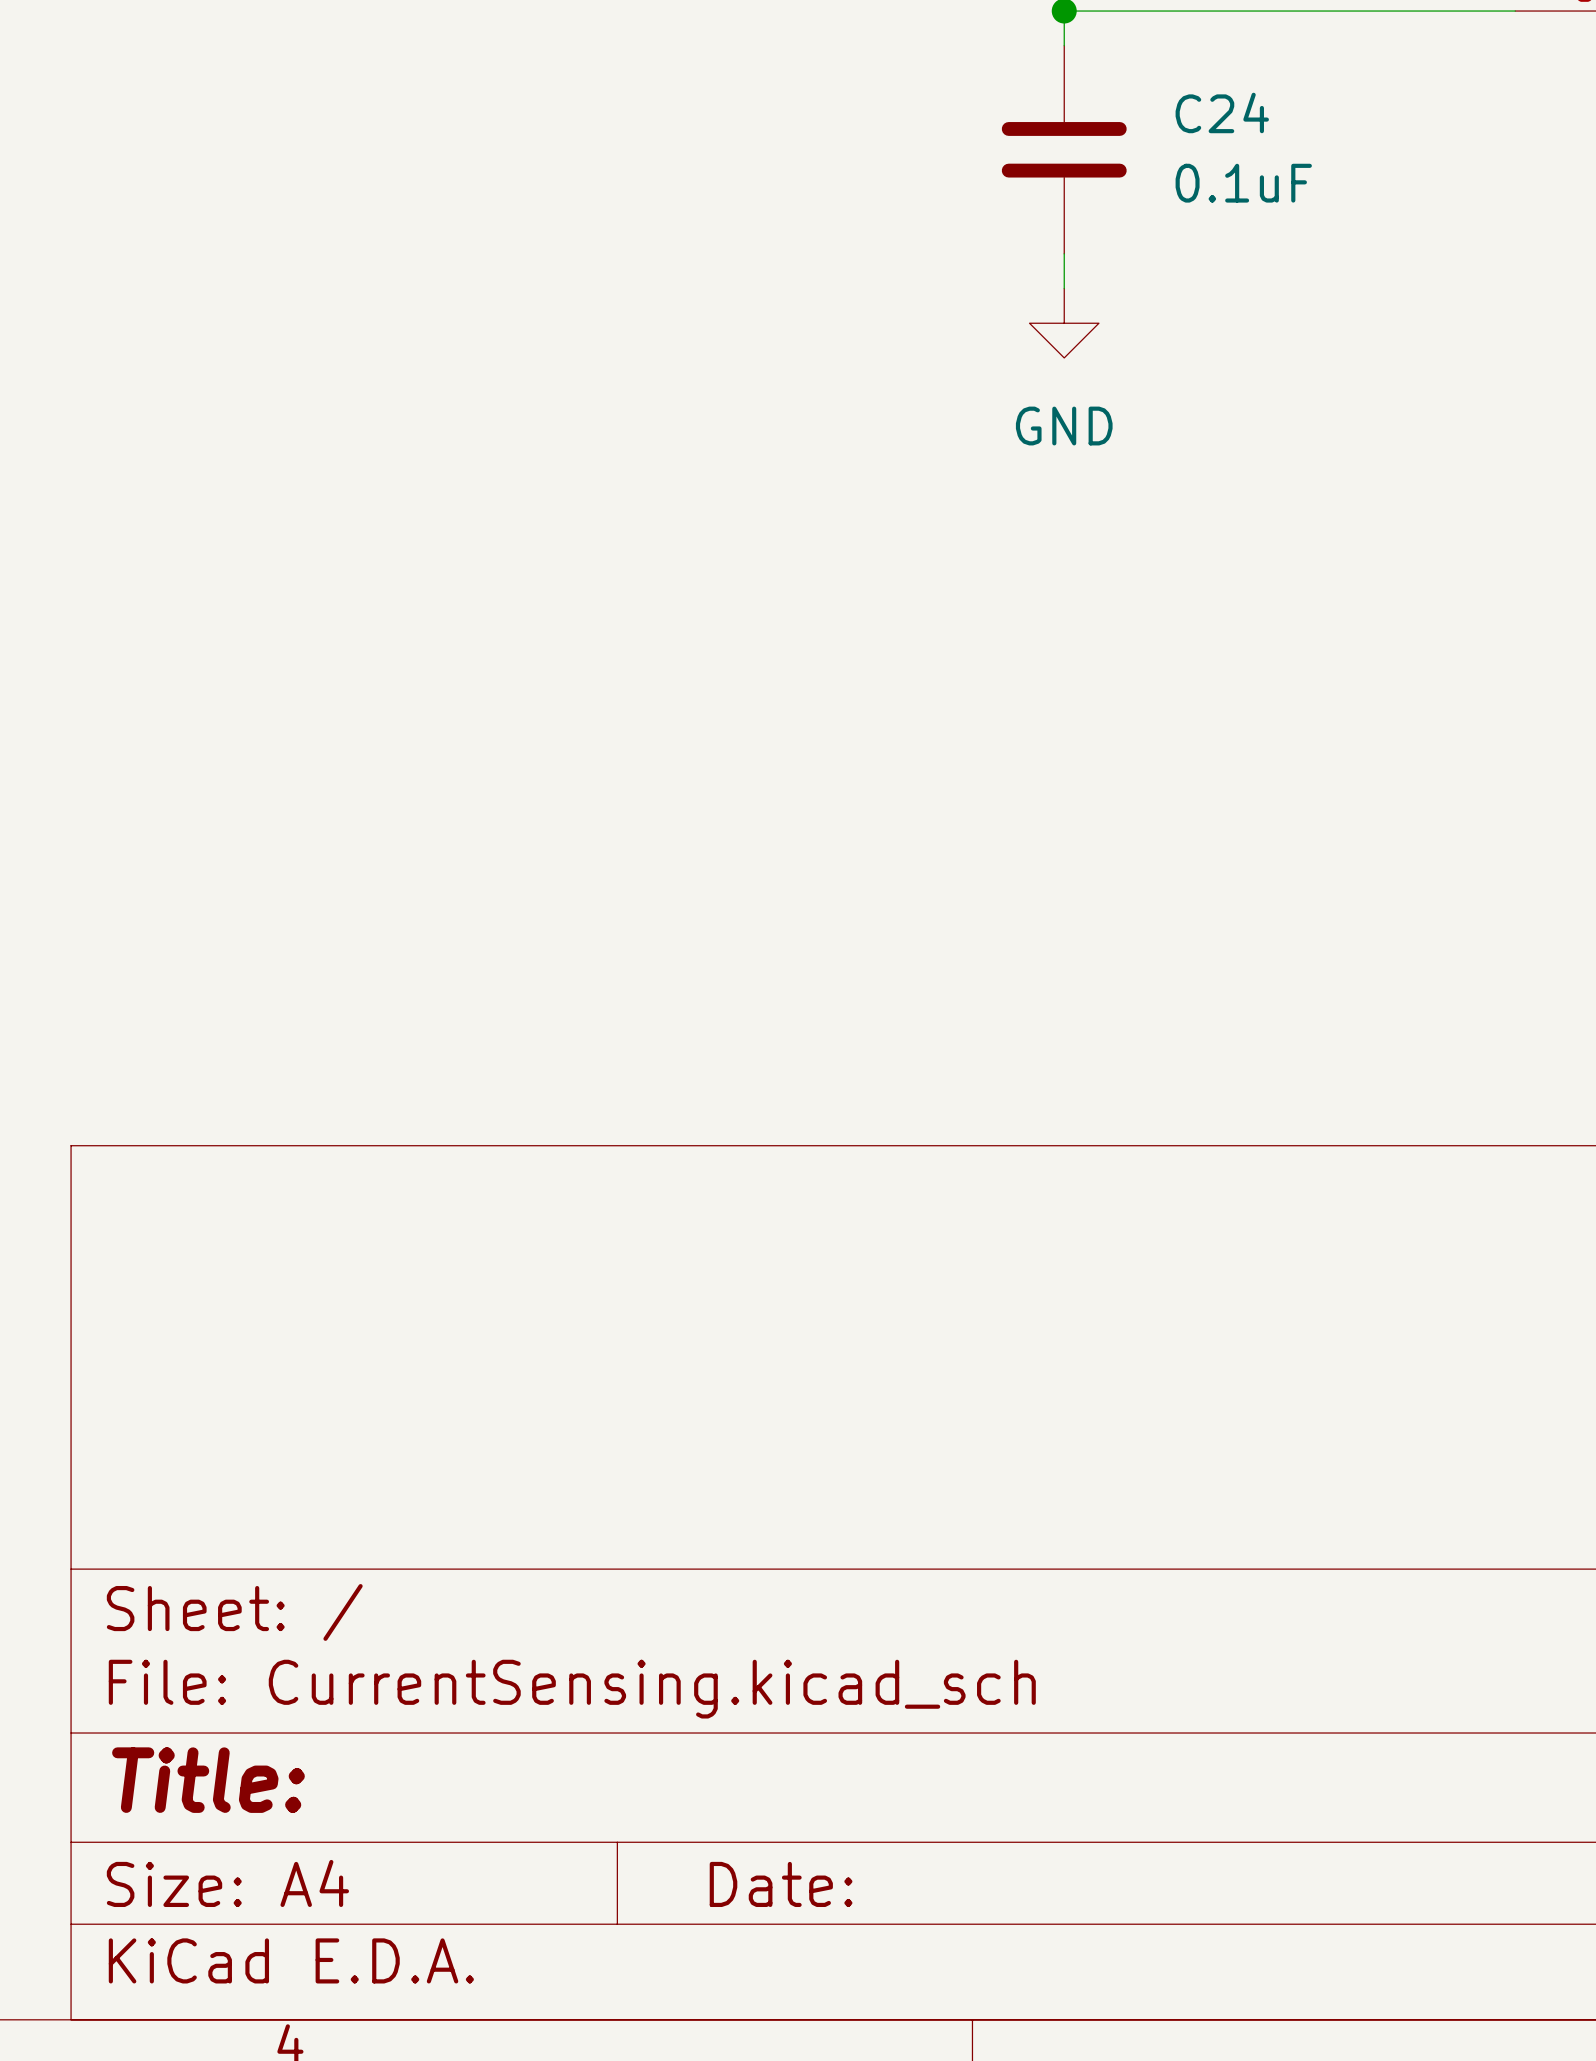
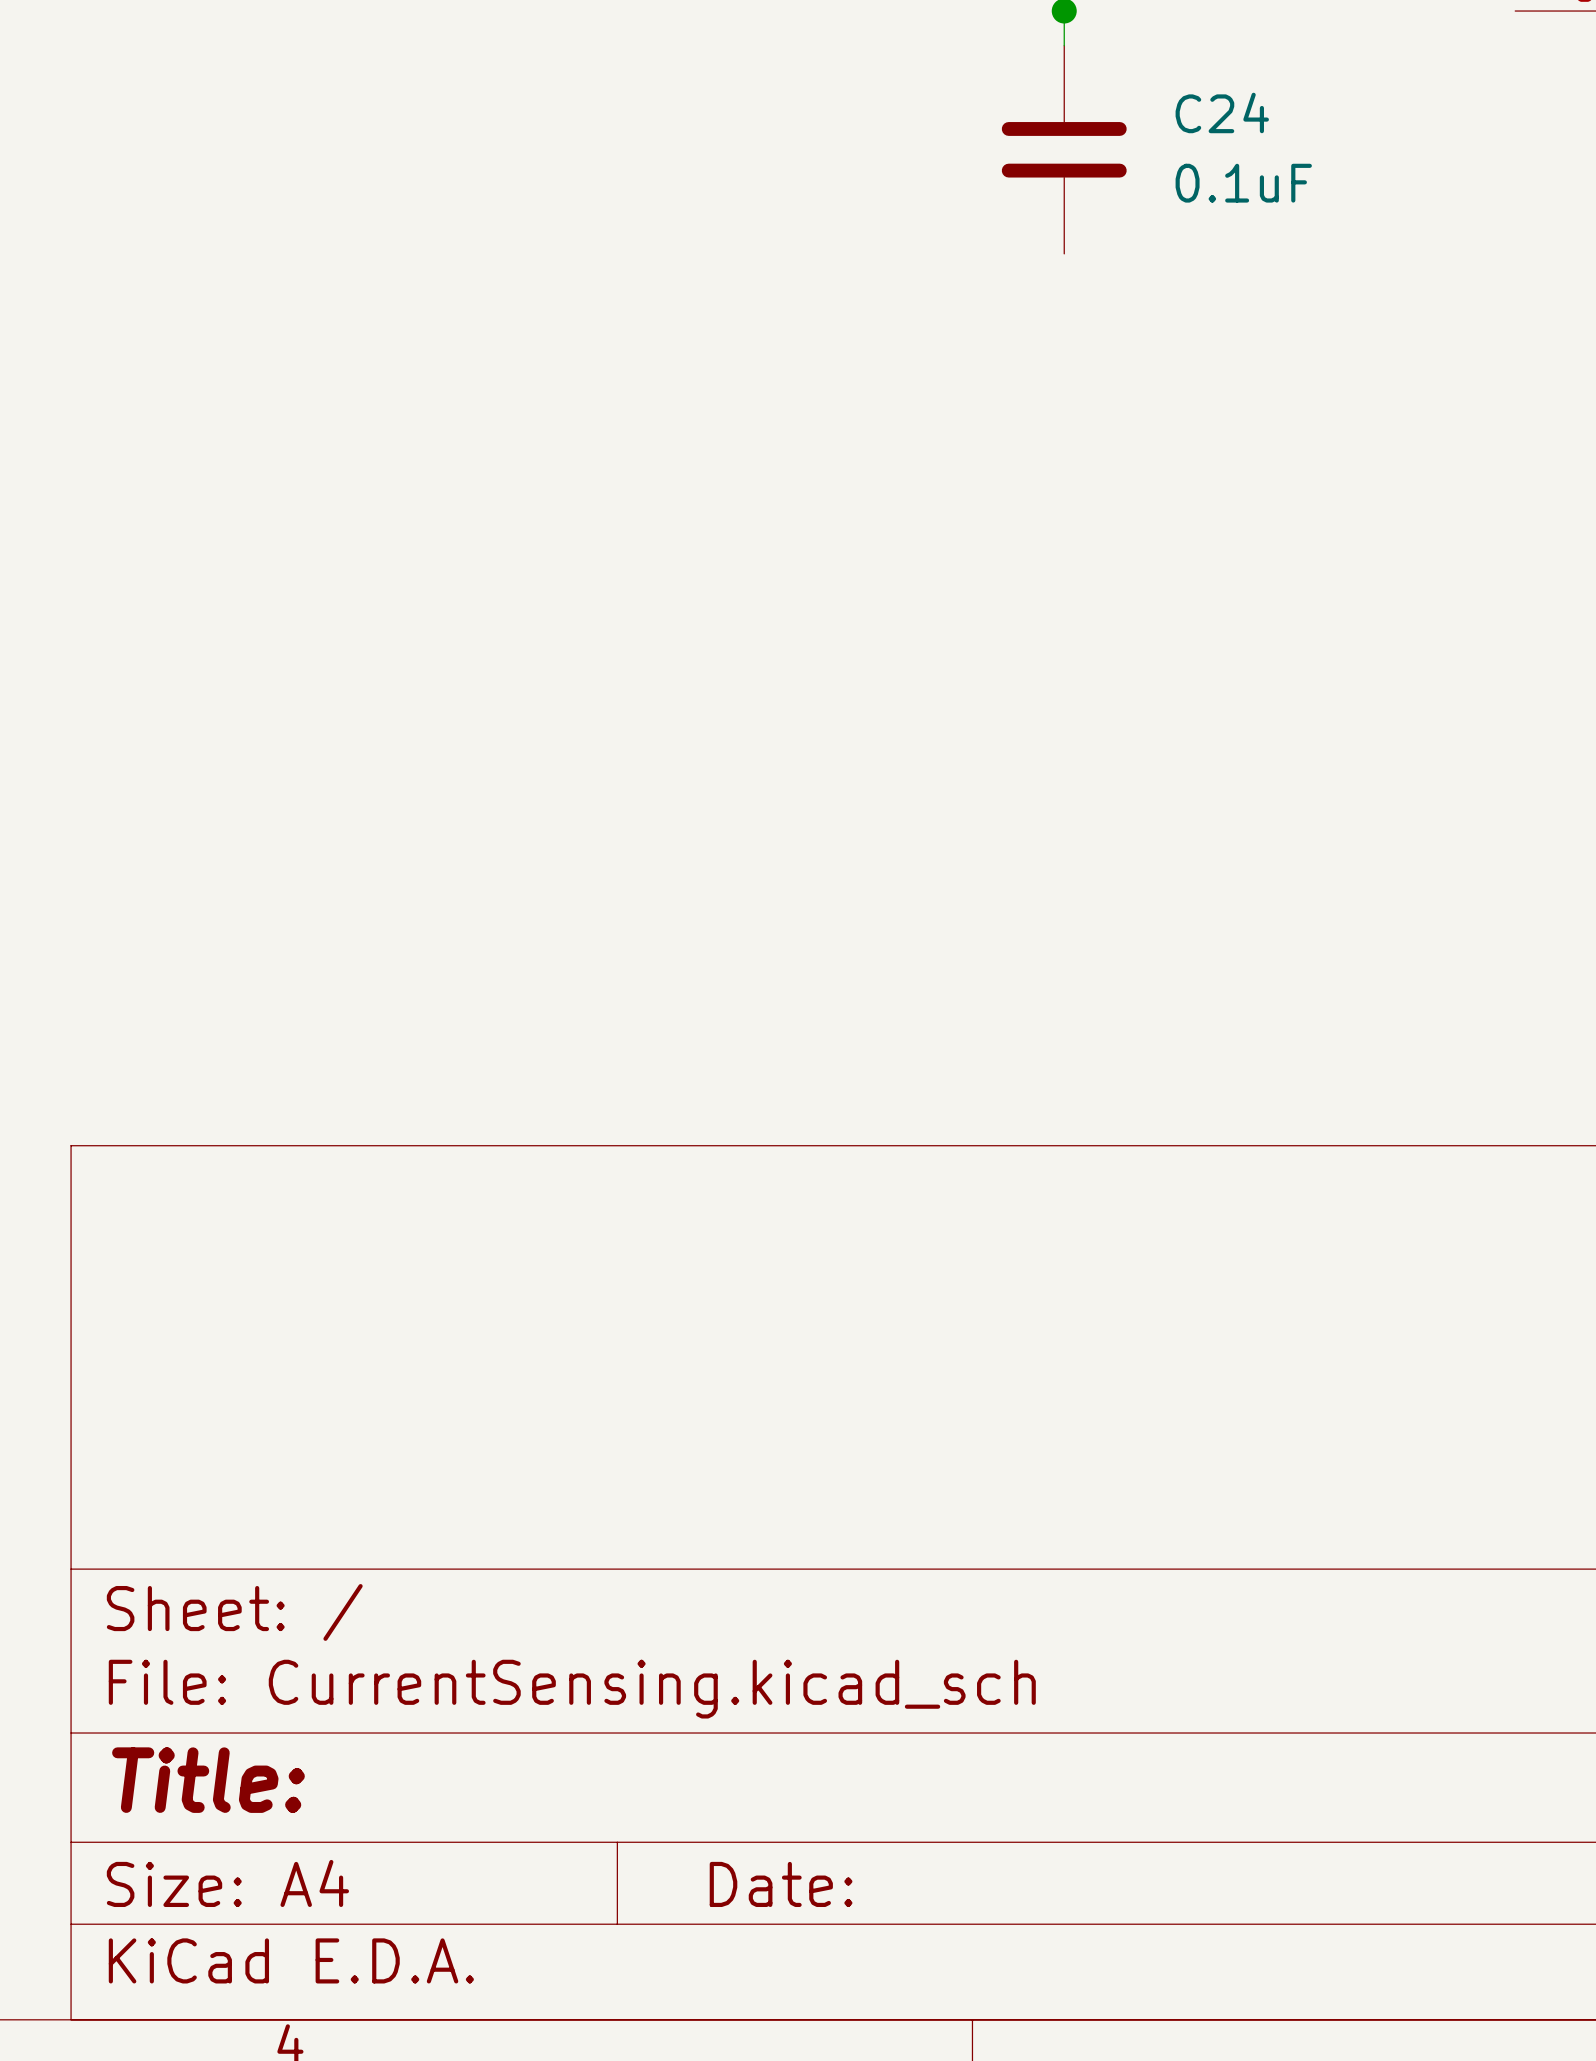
wire: (1064, 11) (1515, 11) -> none
wire: (1064, 253) (1064, 288) -> none
power symbol: GND (1064, 323) -> none

